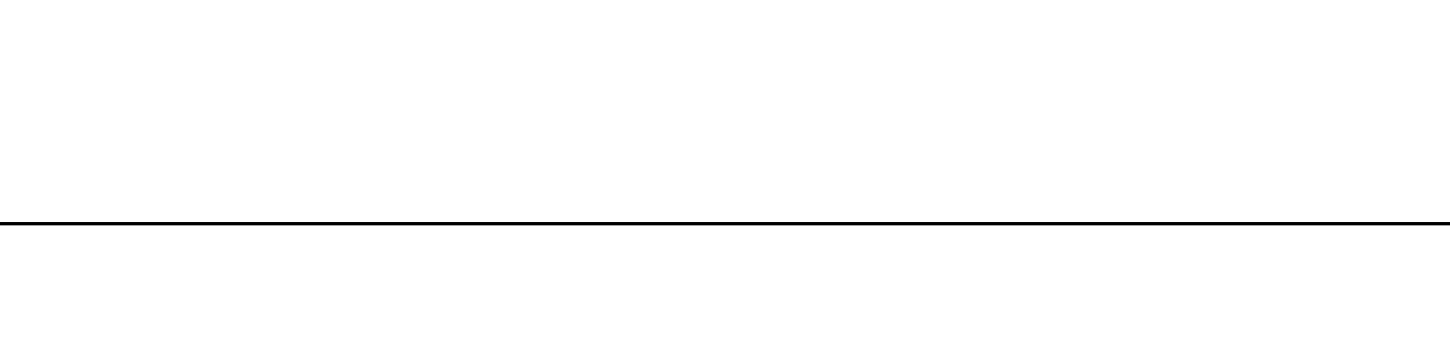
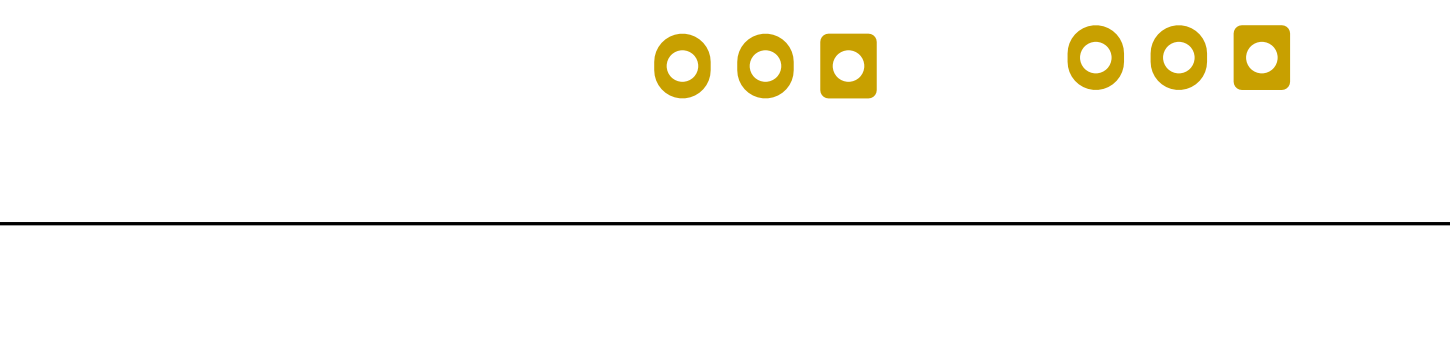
part: none -> (1178, 57)
part: none -> (765, 66)

